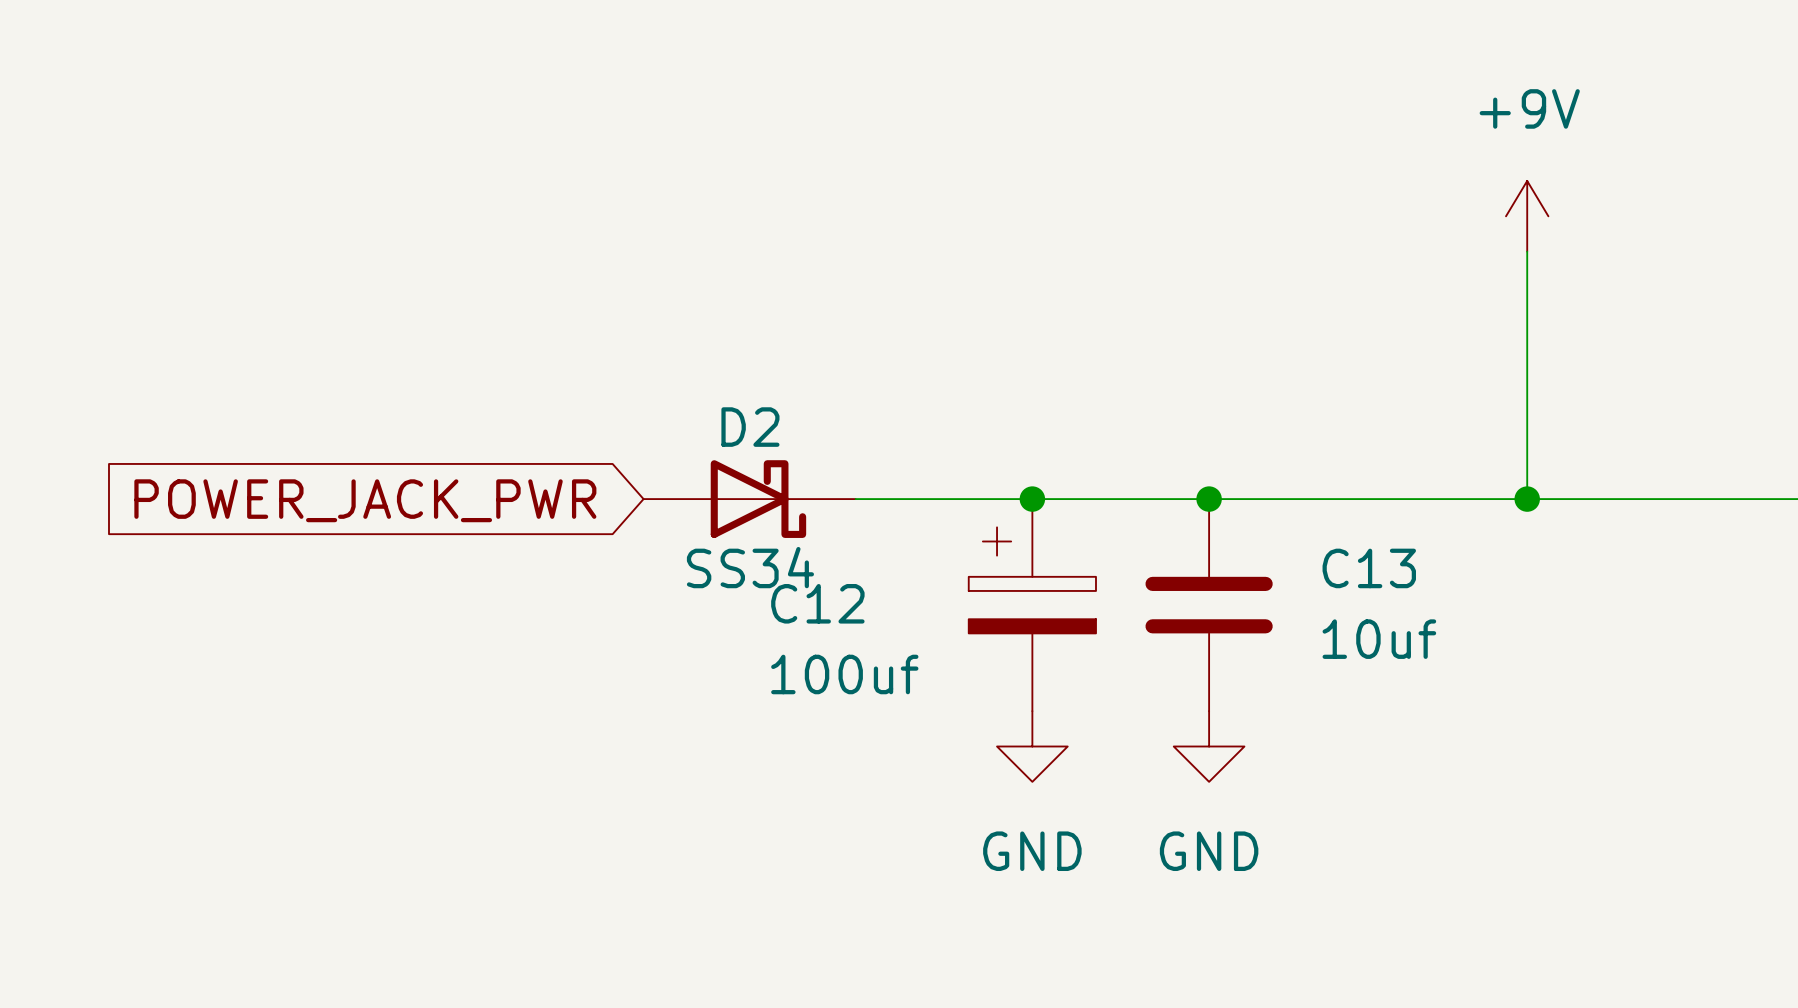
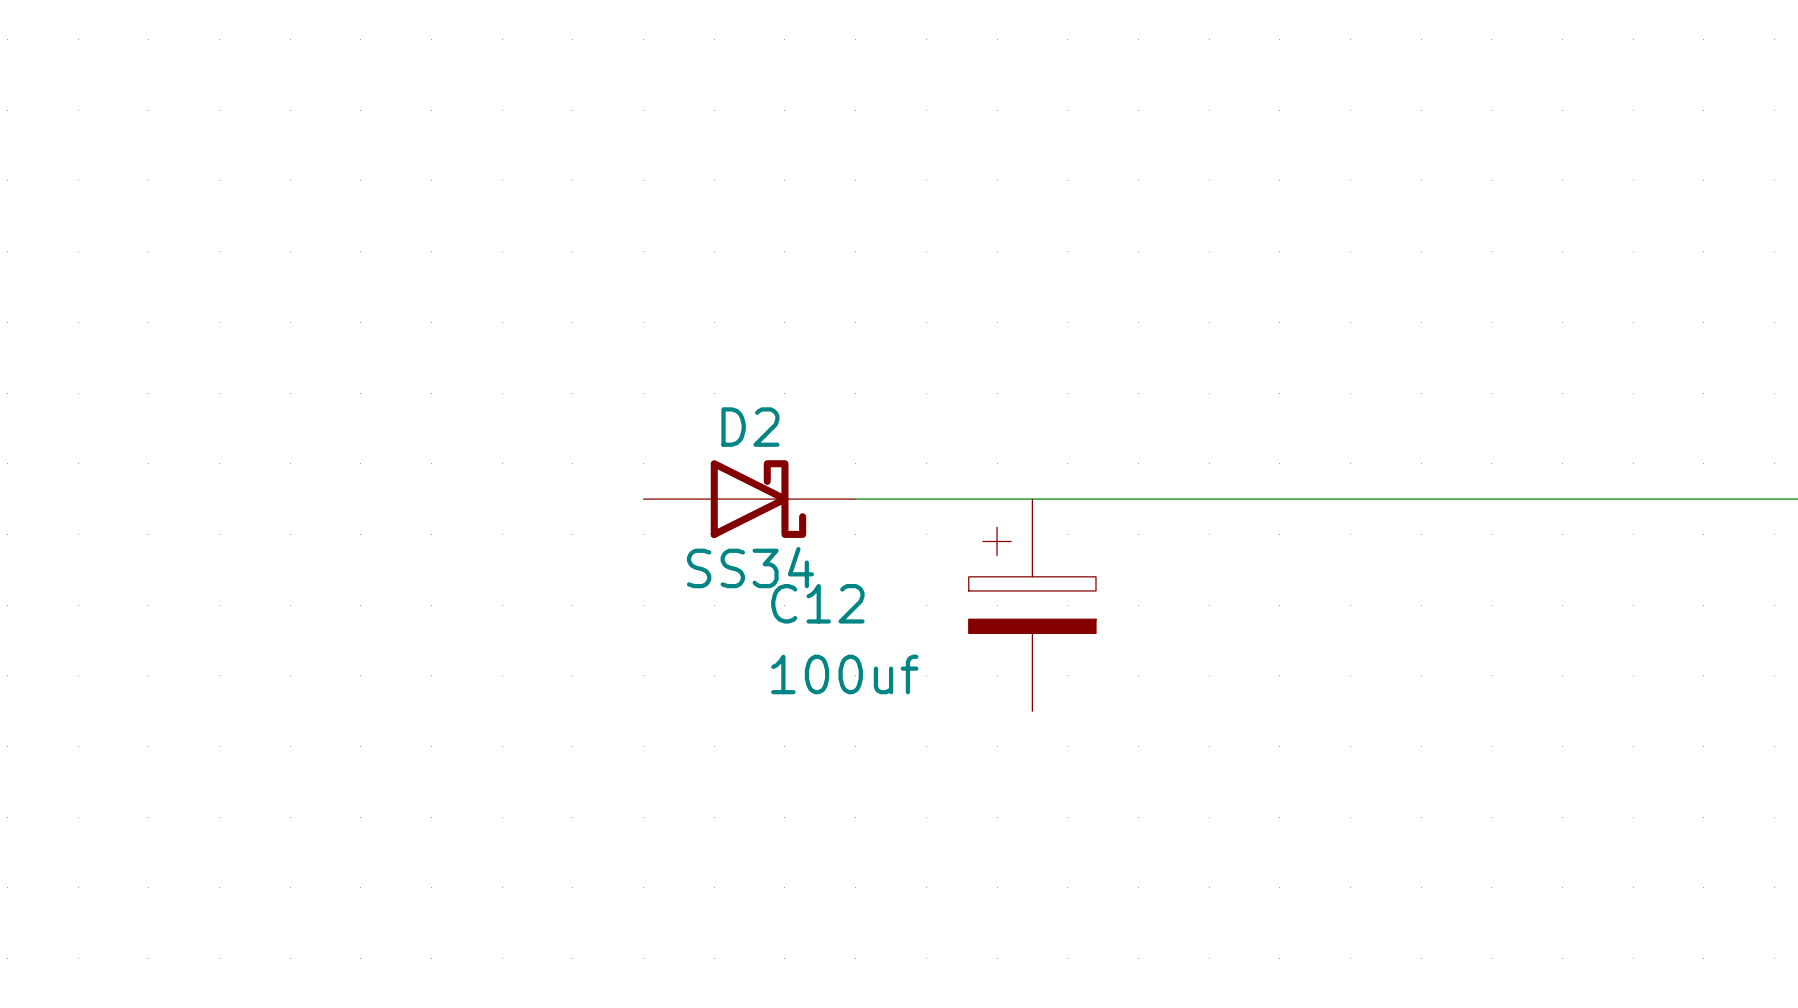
power symbol: +9V (1527, 216) -> none
wire: (1527, 251) (1527, 499) -> none
junction: (1032, 499) -> none
junction: (1209, 499) -> none
junction: (1527, 499) -> none
global label: POWER_JACK_PWR (365, 500) -> none
C13: 10uf (1209, 605) -> none
power symbol: GND (1032, 746) -> none
power symbol: GND (1209, 746) -> none

